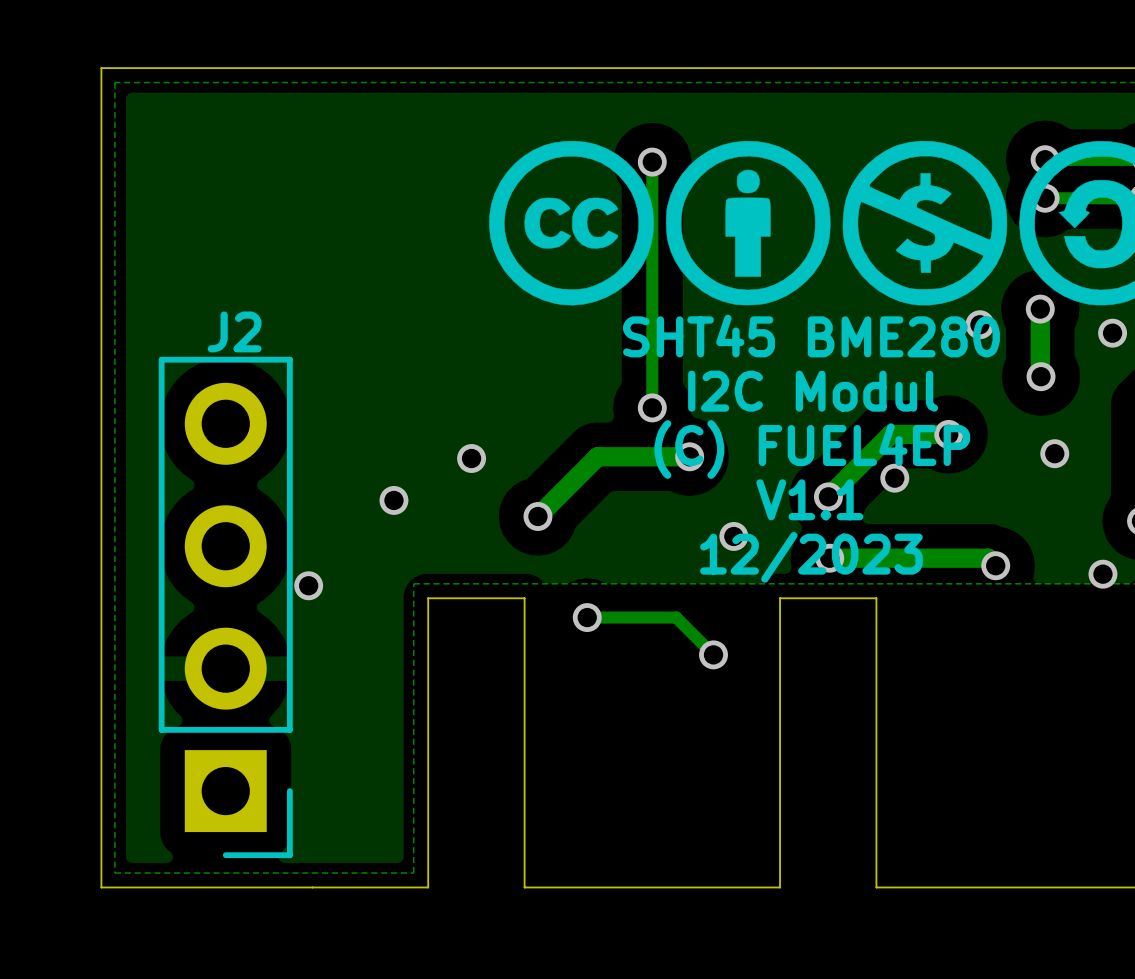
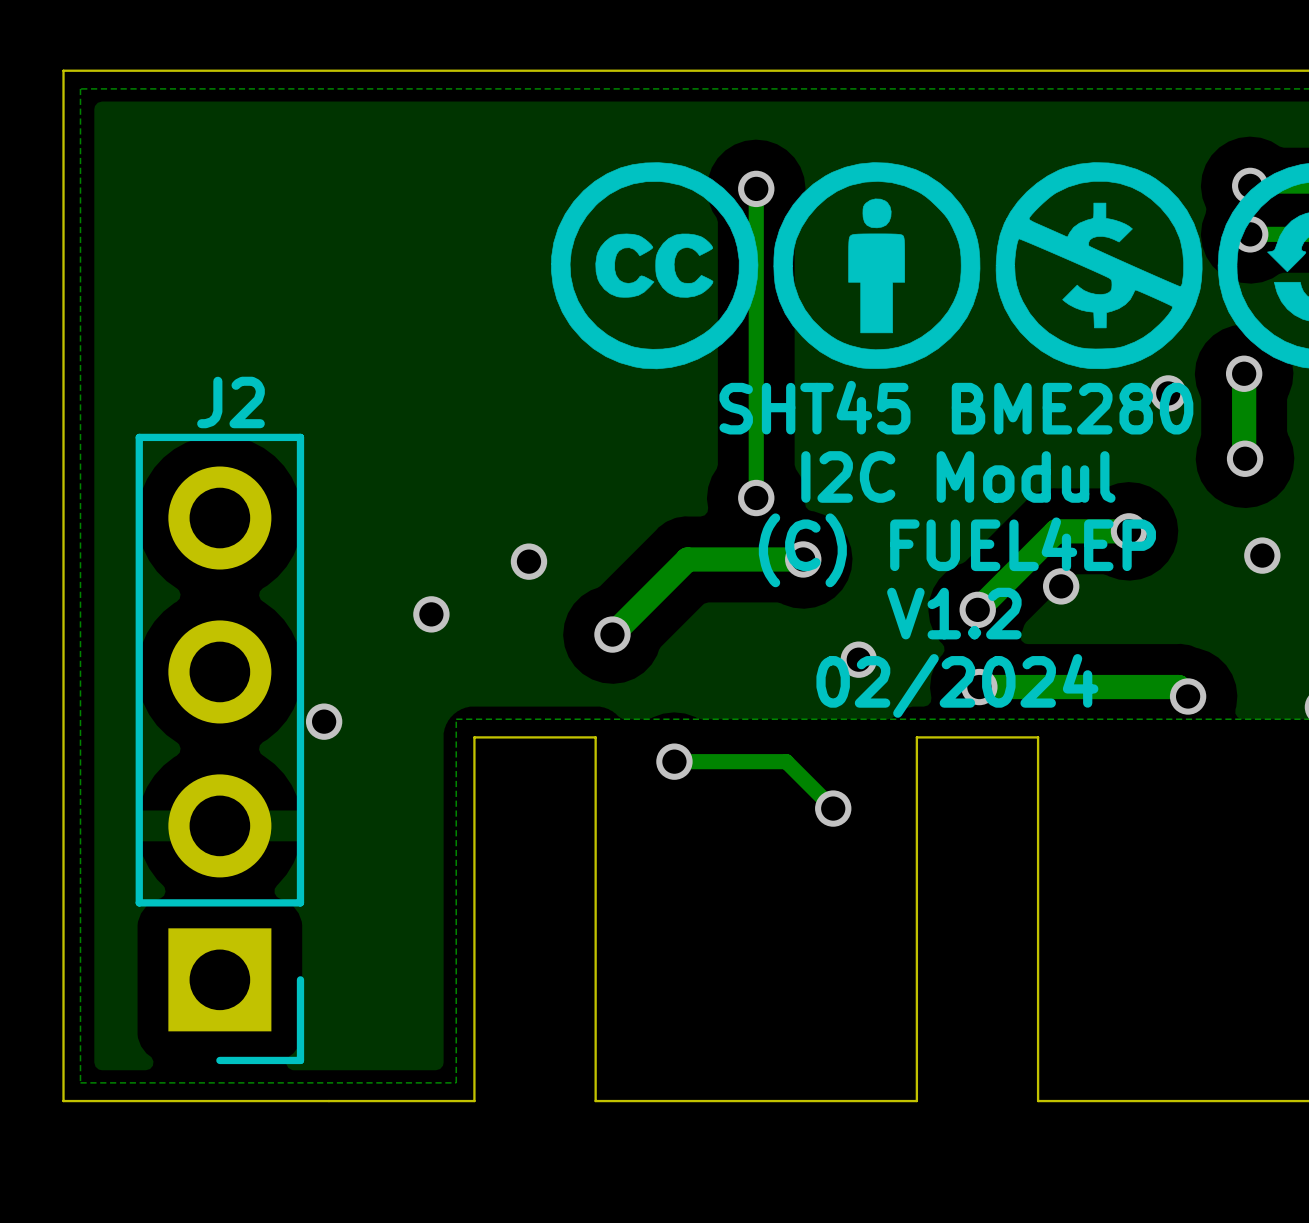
text: V1.1 (809, 499) -> V1.2 (954, 613)
text: 12/2023 (811, 557) -> 02/2024 (957, 685)

